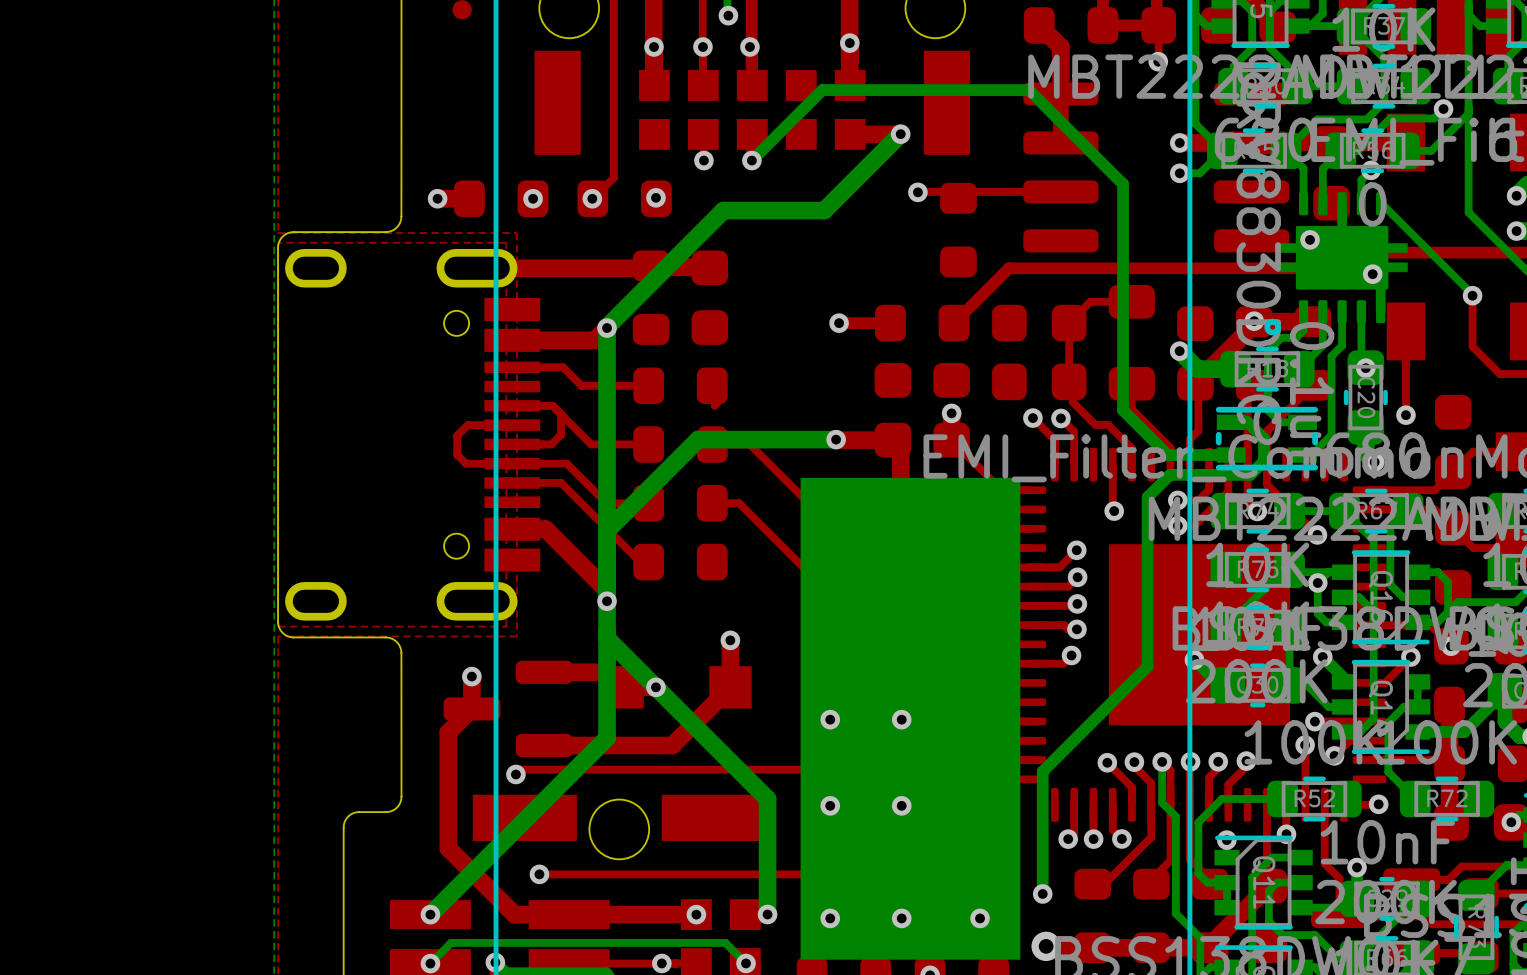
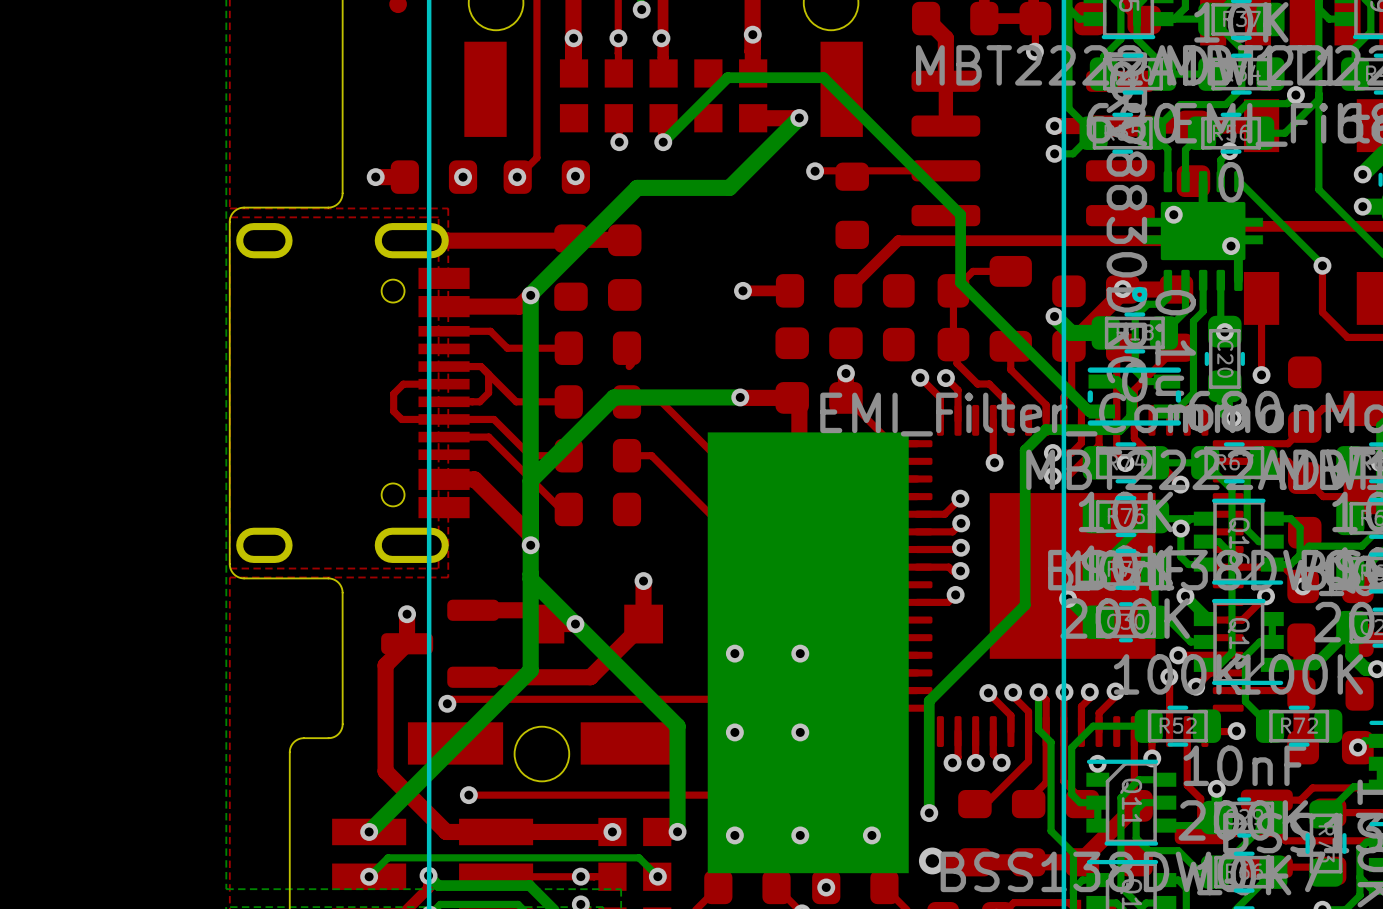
bottom track: (927, 90) (1029, 90) (1123, 184) (1123, 410) (1167, 455) (1217, 455) -> (823, 77) (960, 214) (960, 282) (1089, 411)

